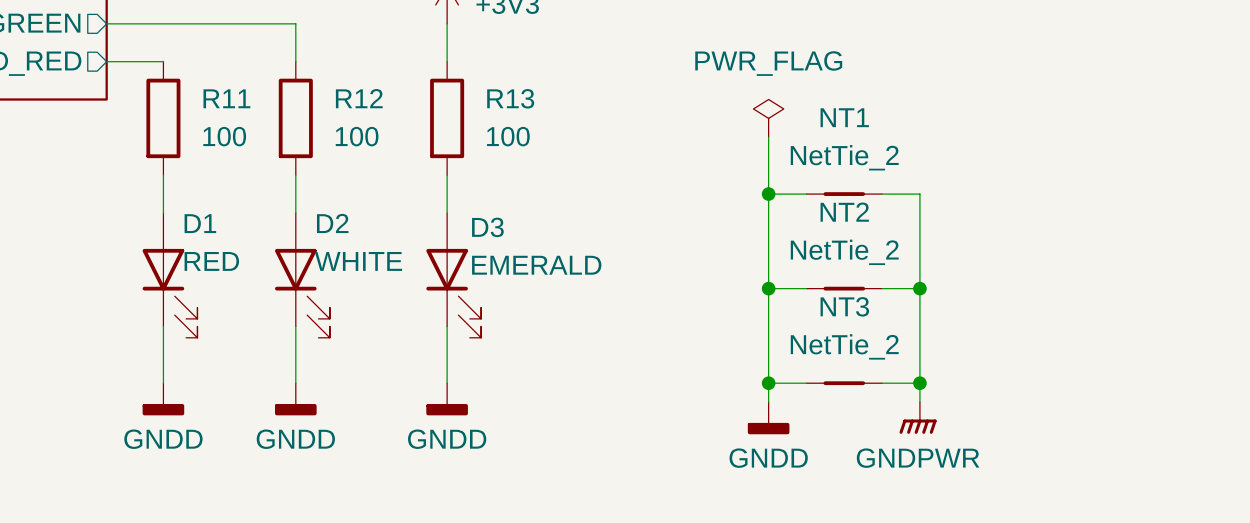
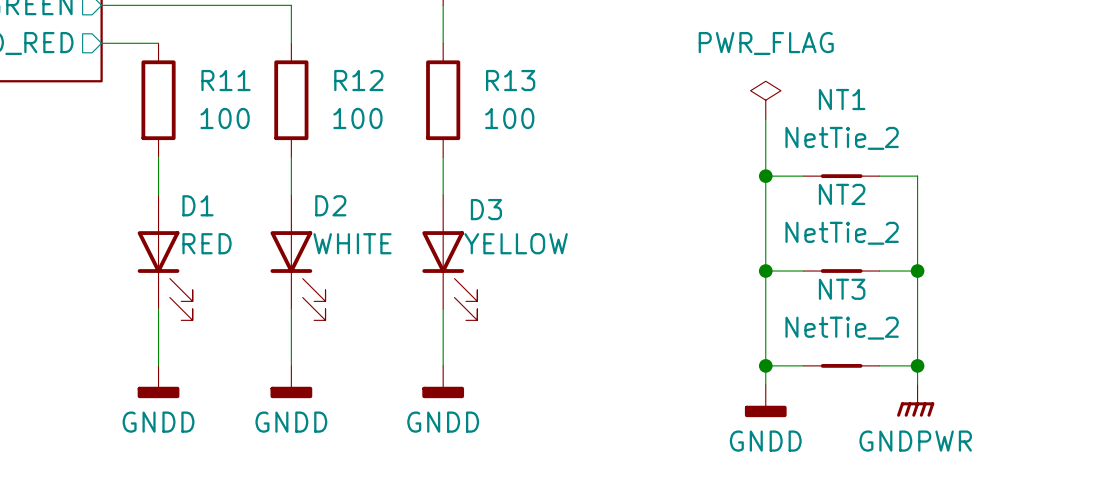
D3 value: EMERALD (536, 265) -> YELLOW (516, 243)

